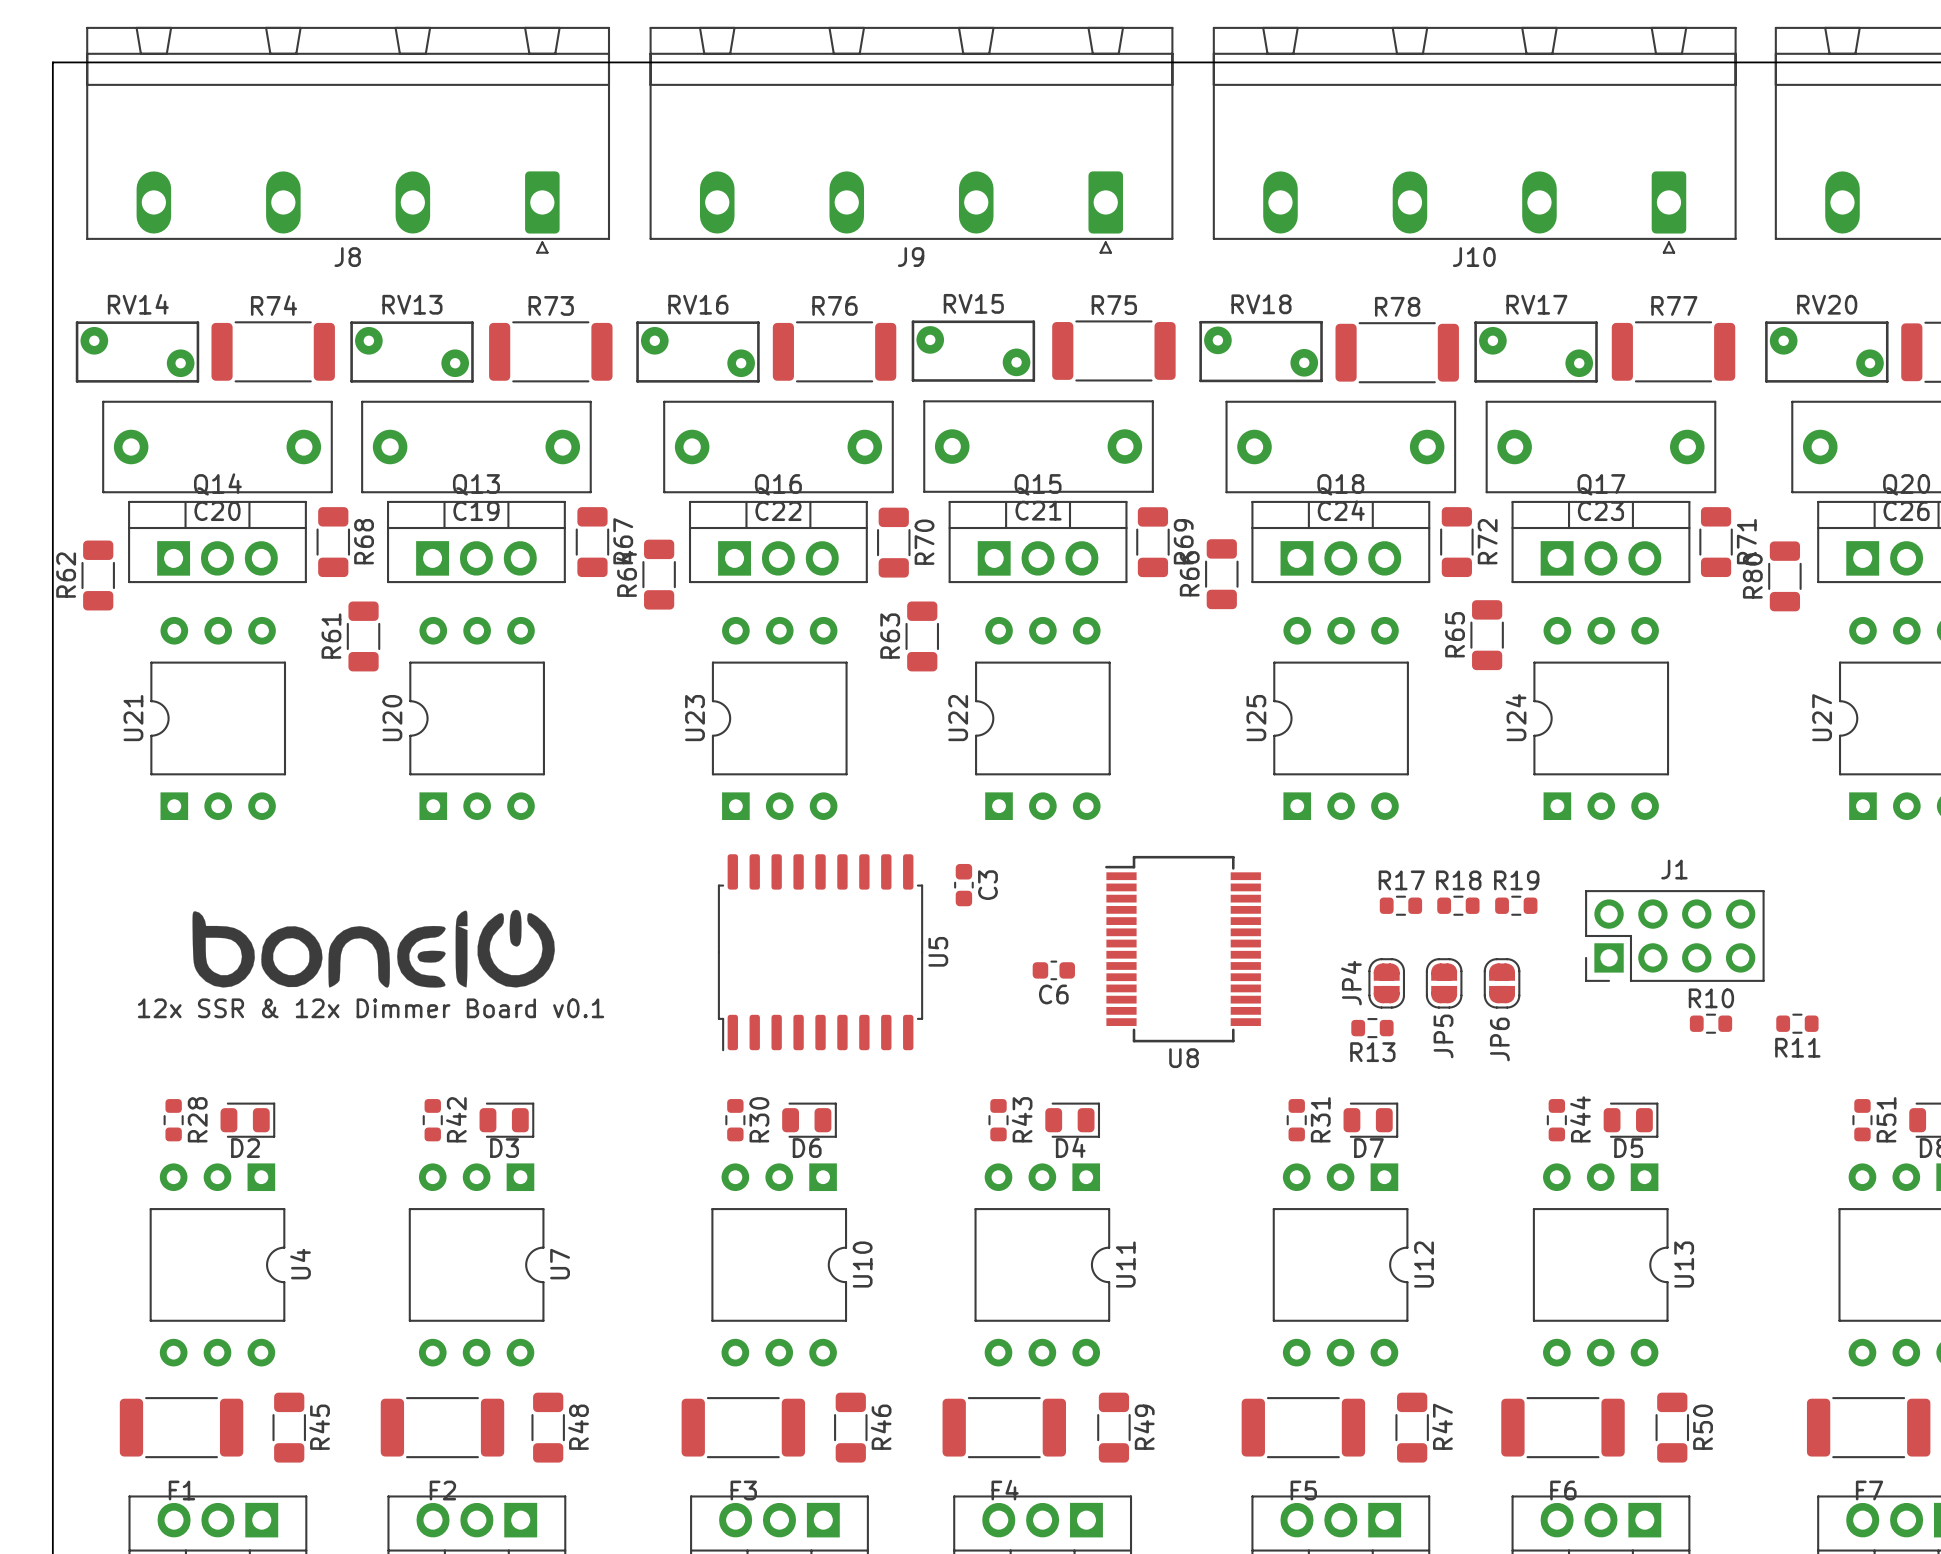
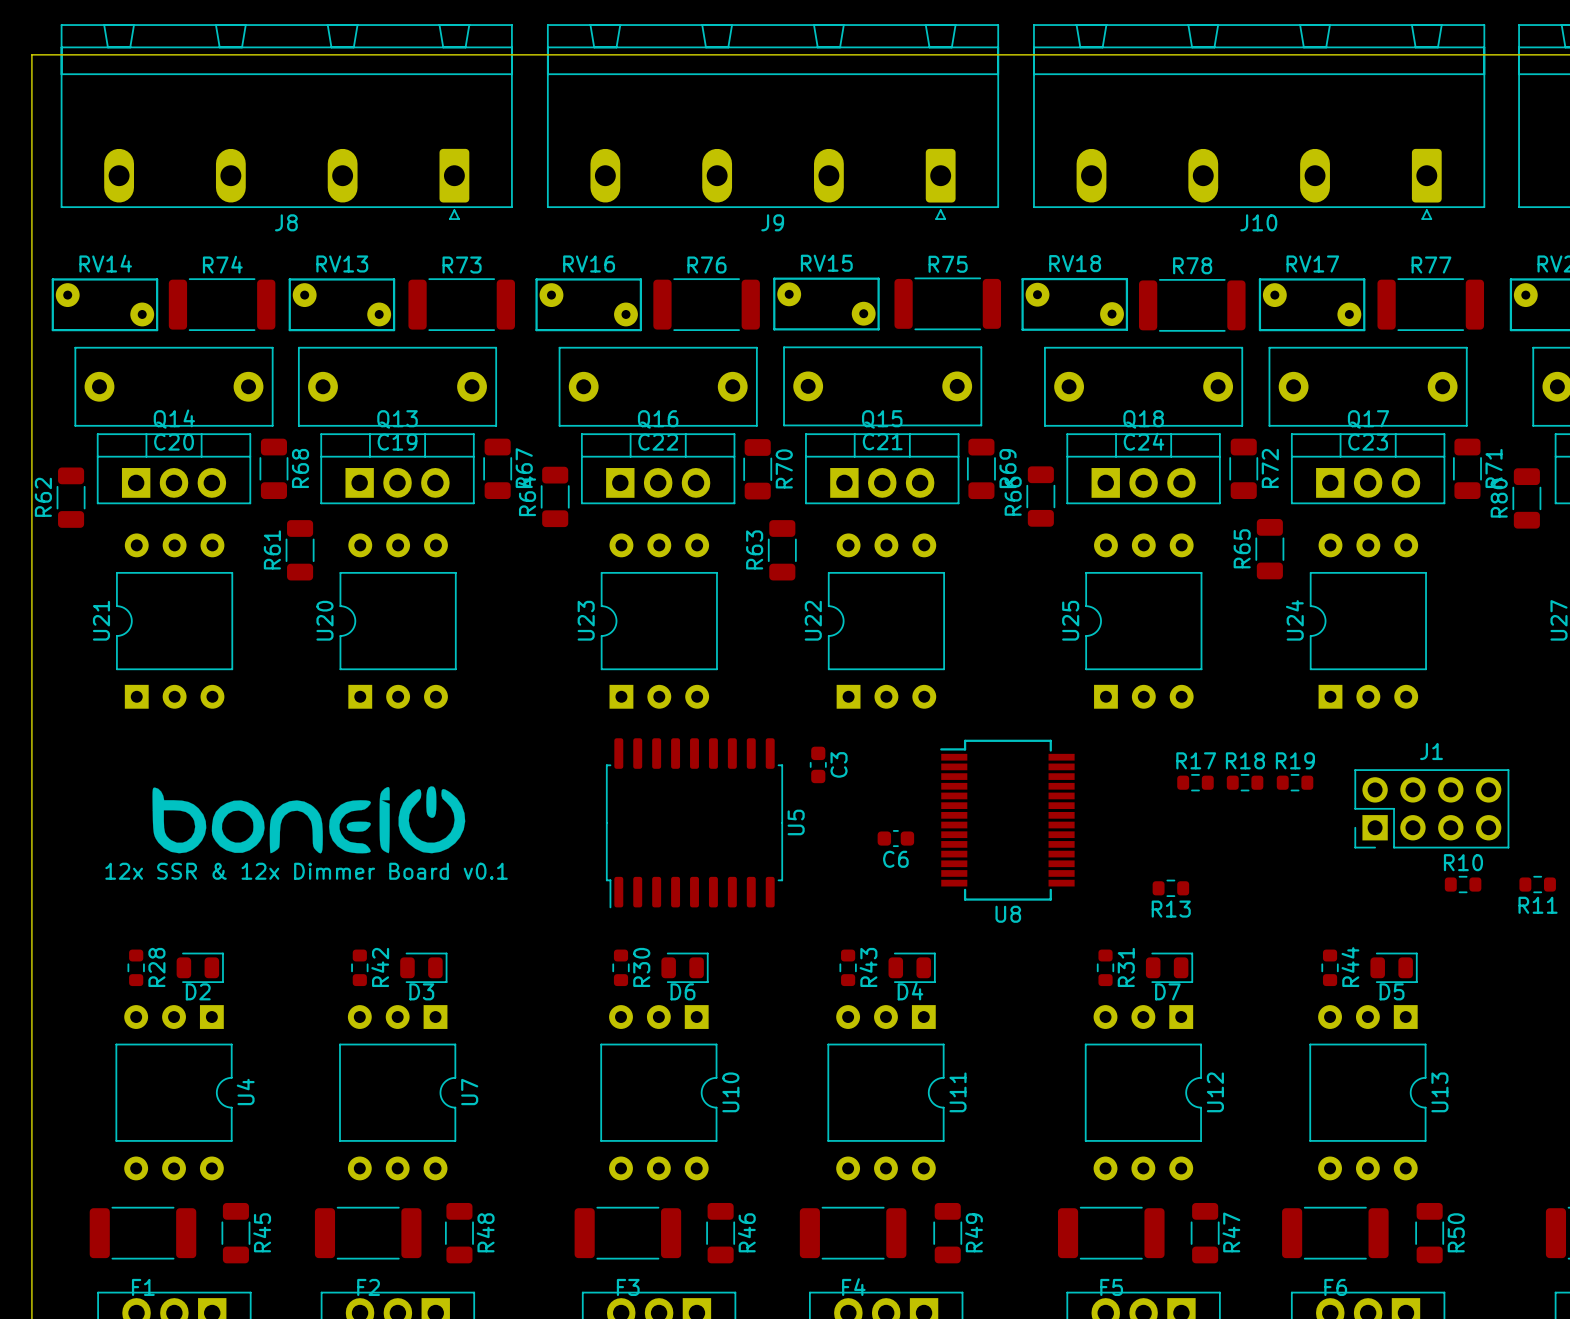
JP4: (1386, 983) -> none
JP5: (1444, 983) -> none
JP6: (1502, 983) -> none

